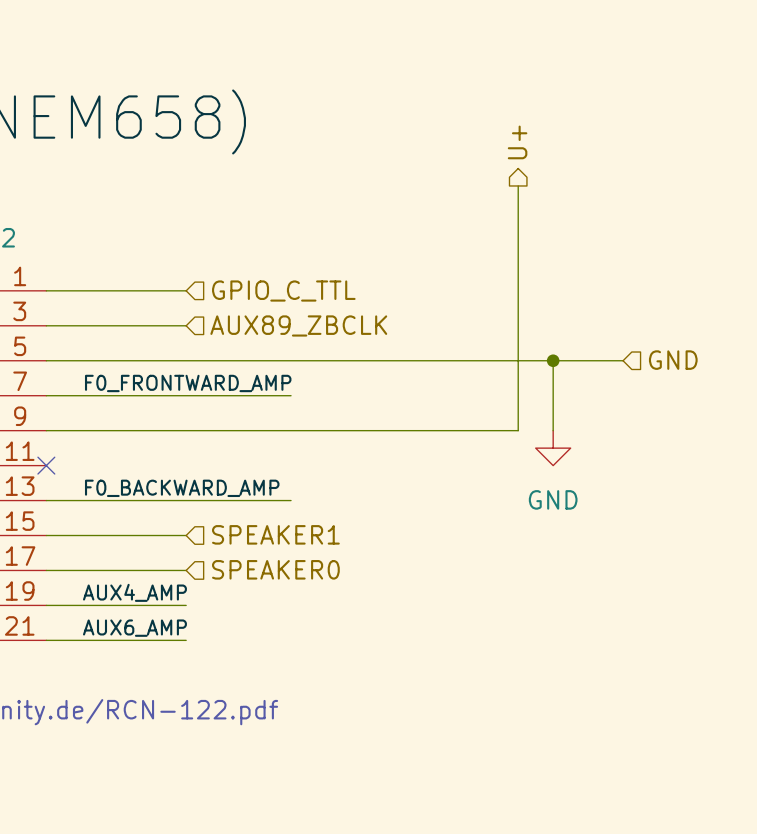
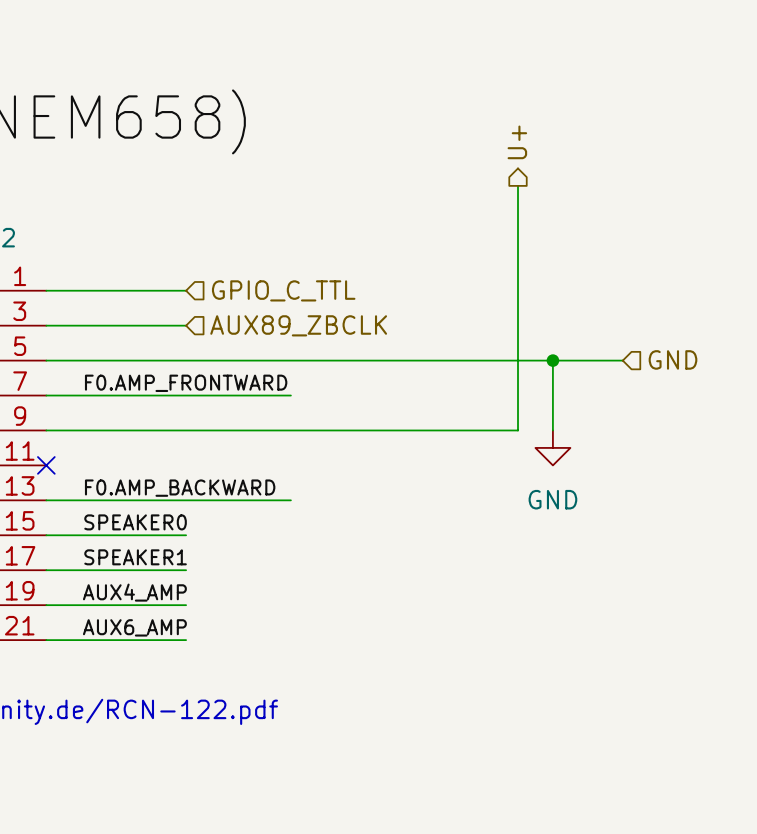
label: F0_FRONTWARD_AMP (188, 383) -> F0.AMP_FRONTWARD (186, 383)
label: F0_BACKWARD_AMP (182, 488) -> F0.AMP_BACKWARD (180, 488)
label: none -> SPEAKER0 (135, 522)
hierarchical label: SPEAKER1 (275, 534) -> none
label: none -> SPEAKER1 (135, 557)
hierarchical label: SPEAKER0 (275, 569) -> none

